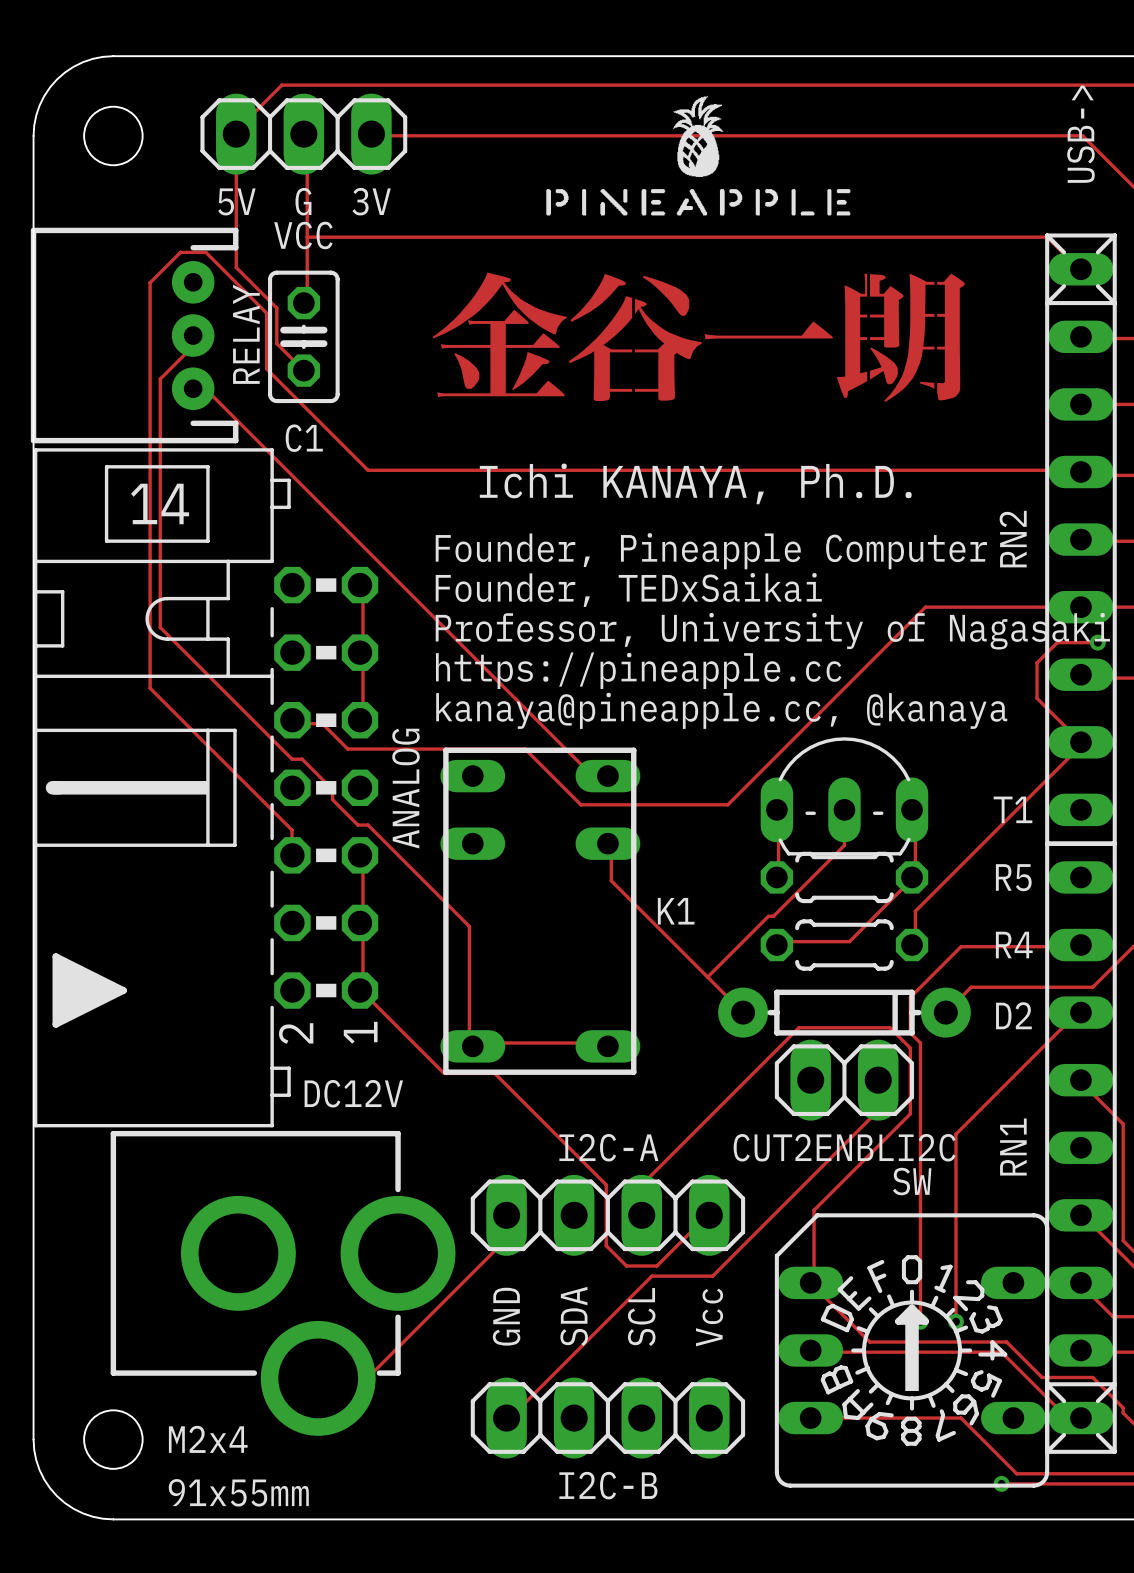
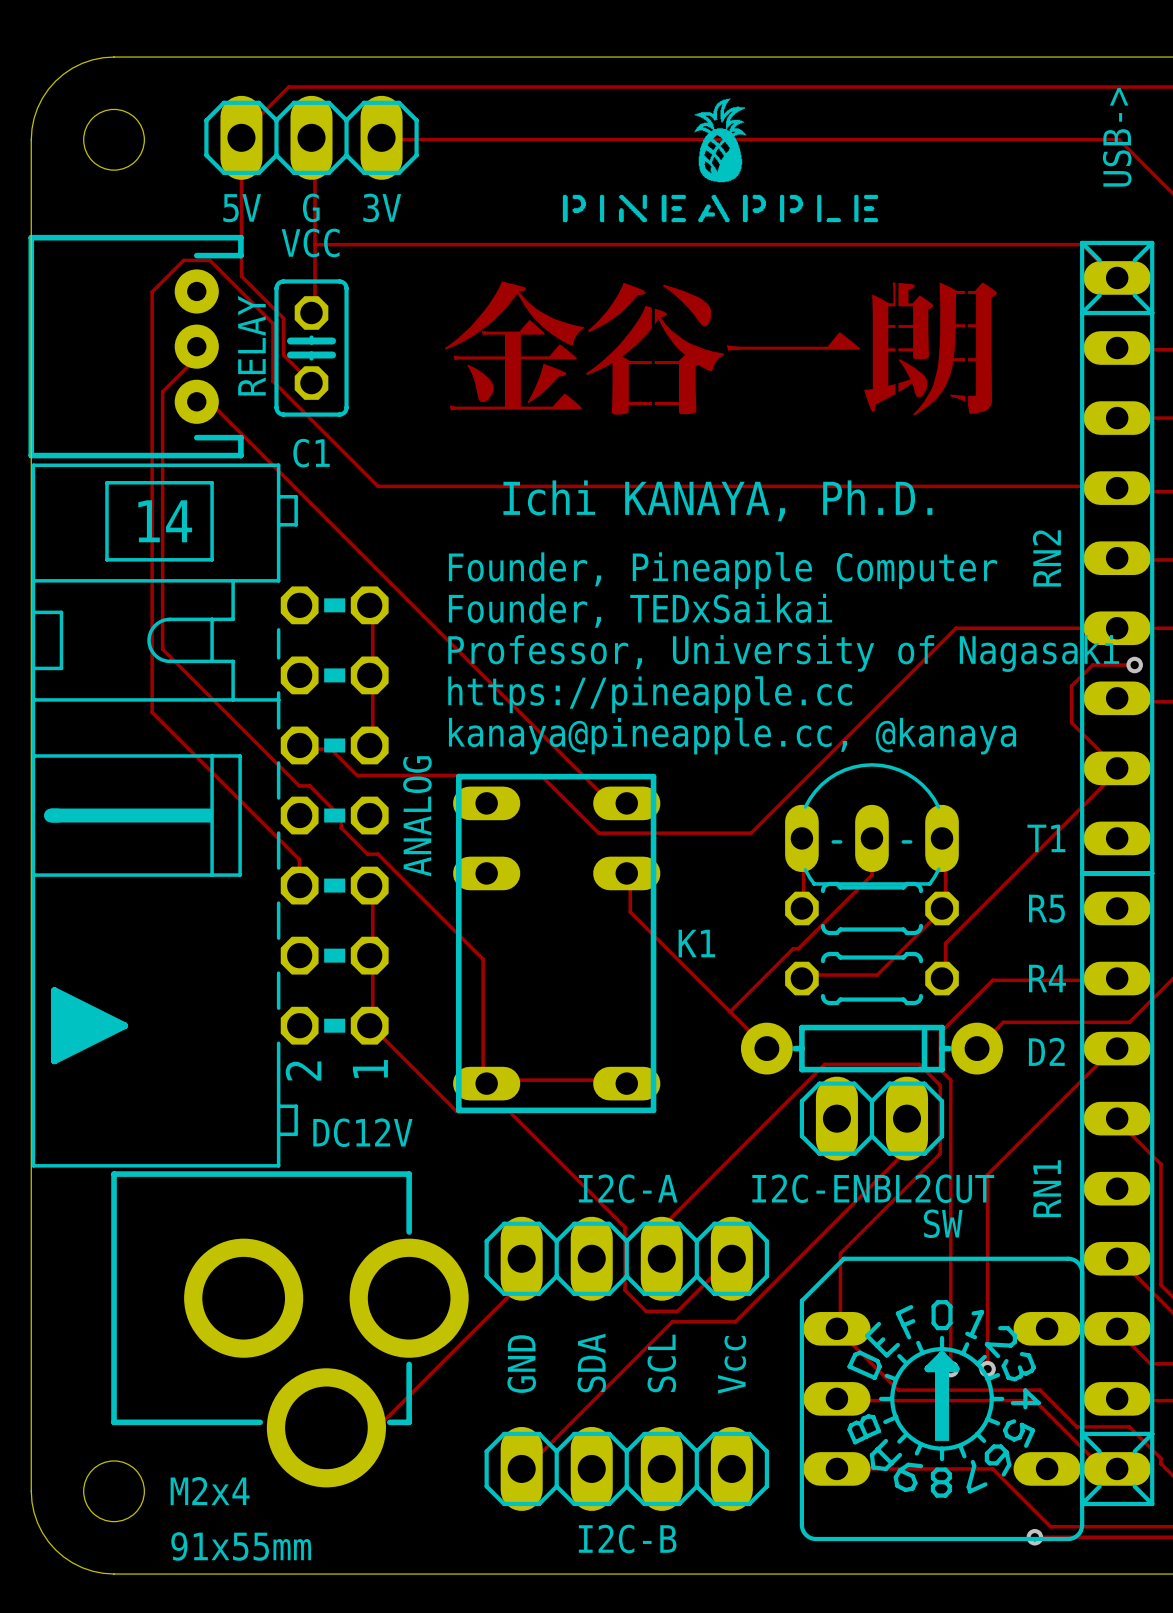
CUT2ENBLI2C name: CUT2ENBLI2C (844, 1147) -> I2C-ENBL2CUT (873, 1188)

